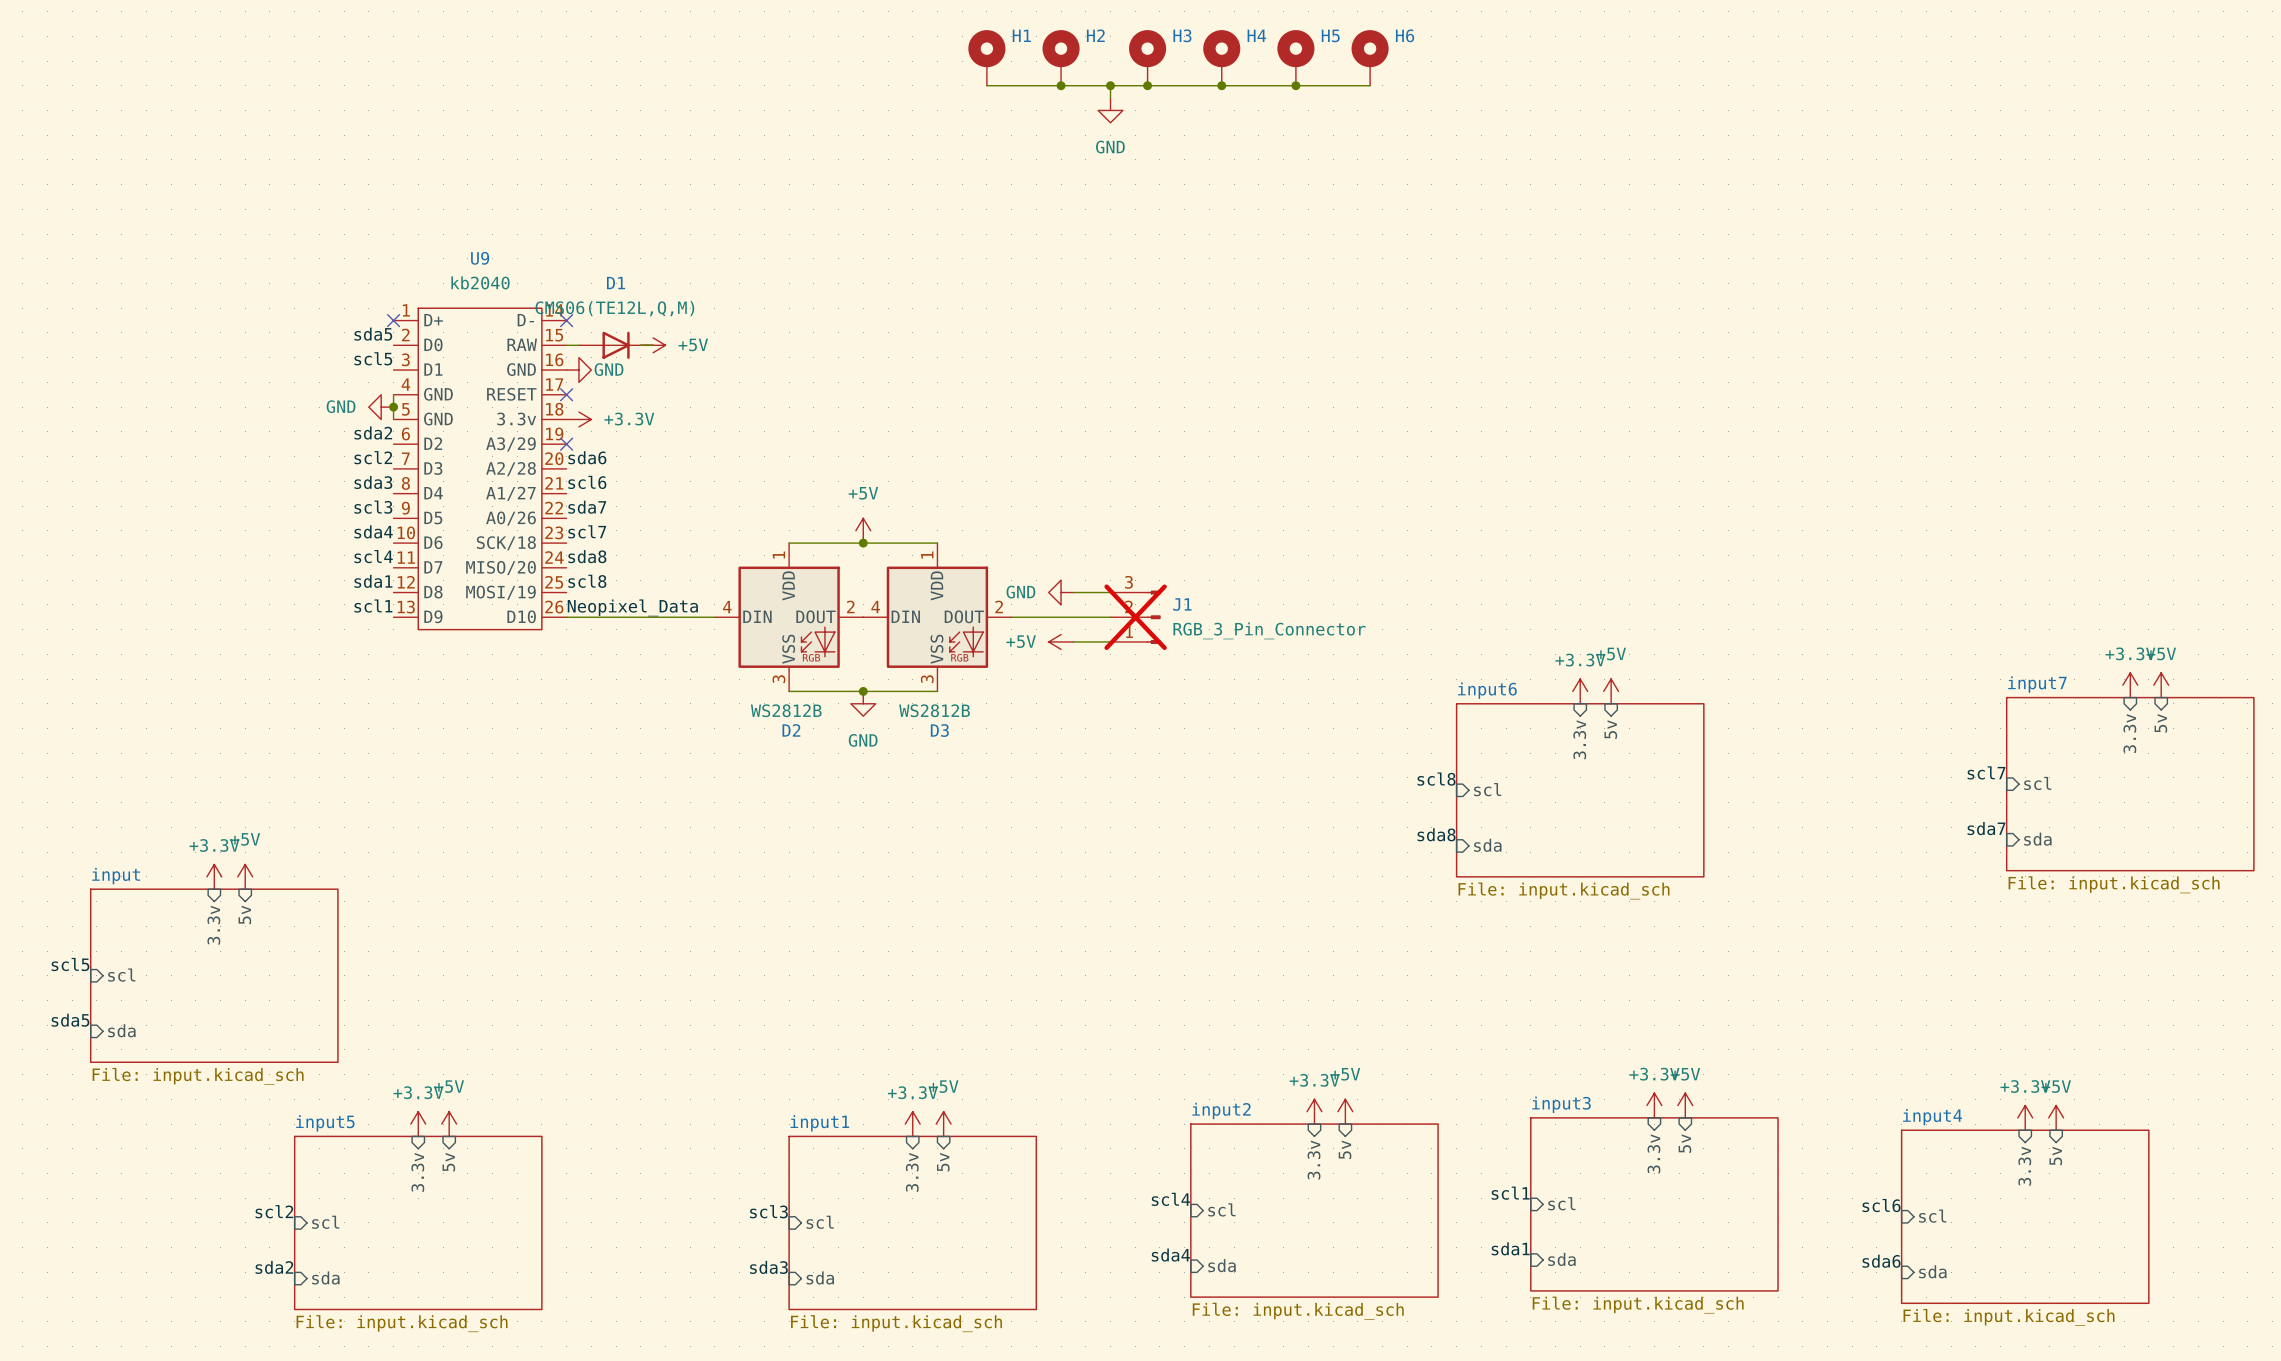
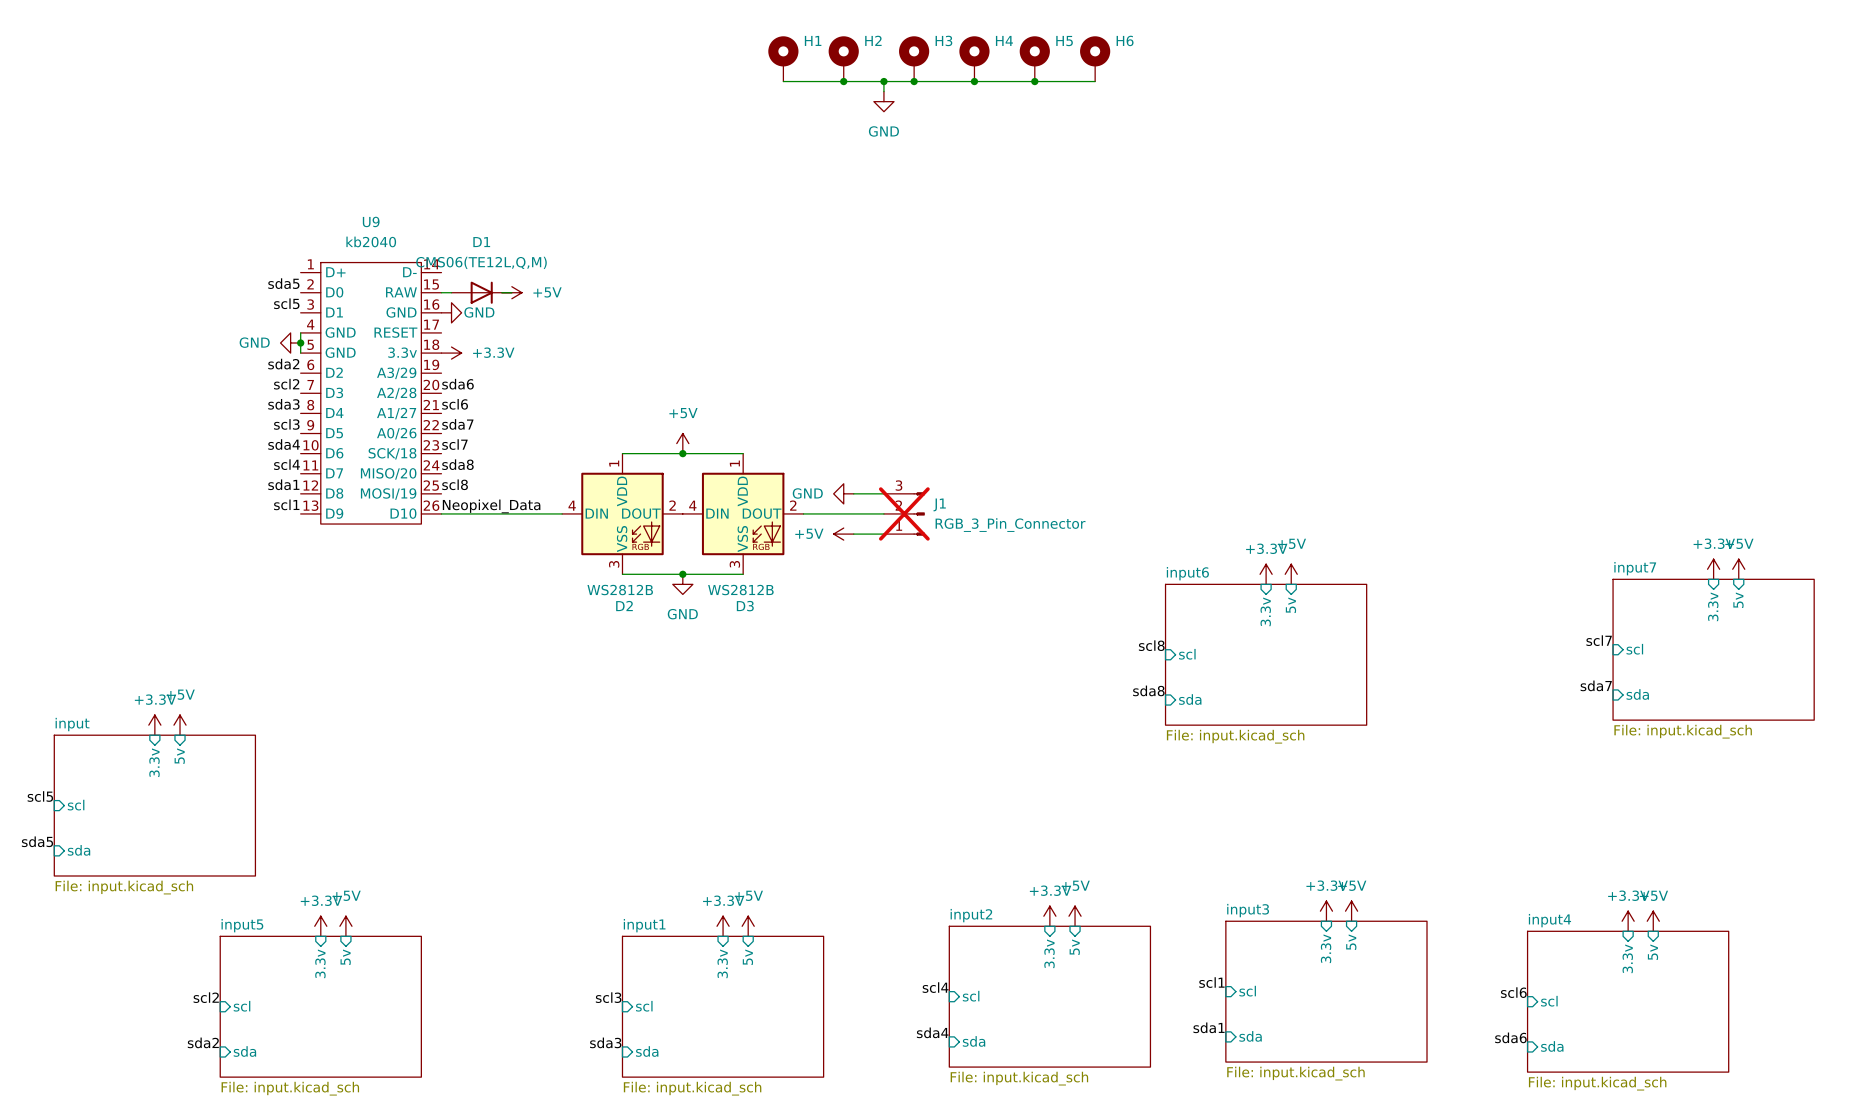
no-connect mark: (393, 320) -> none
no-connect mark: (566, 320) -> none
no-connect mark: (566, 394) -> none
no-connect mark: (566, 444) -> none

